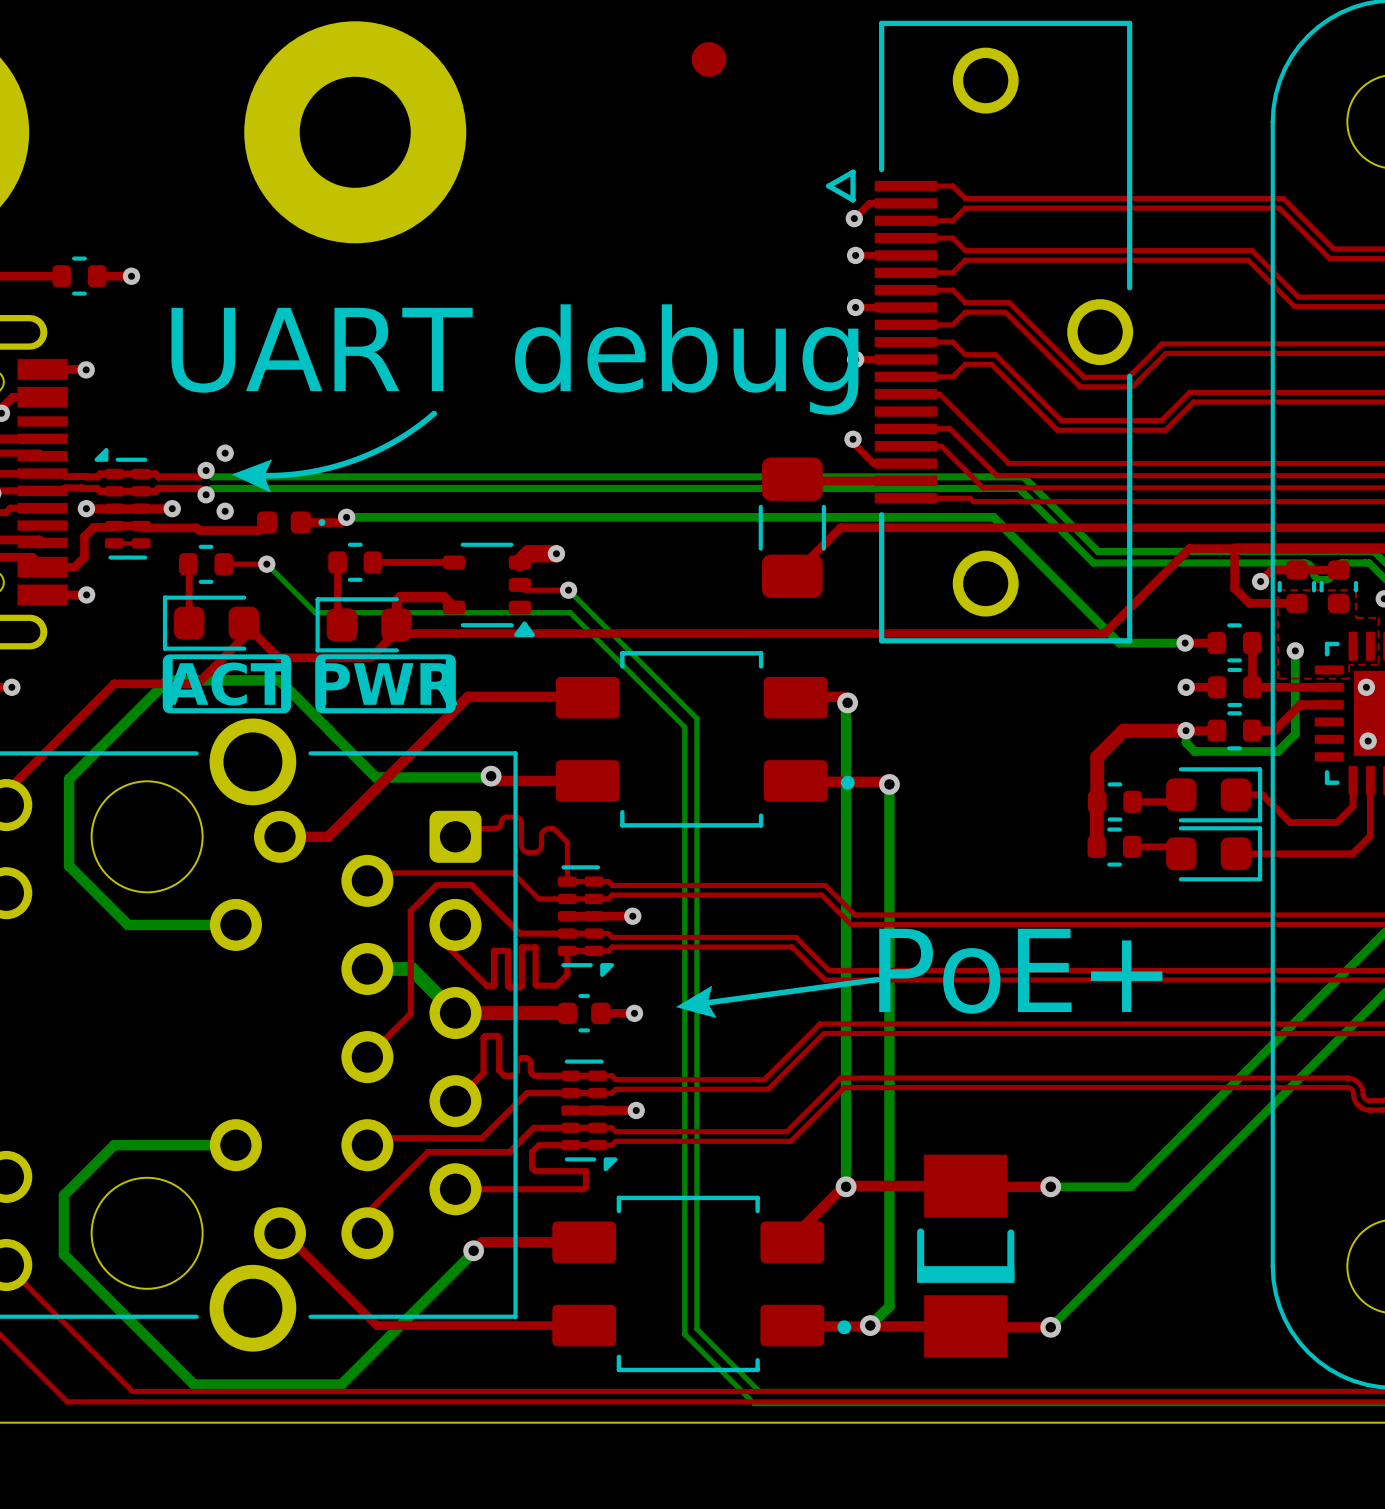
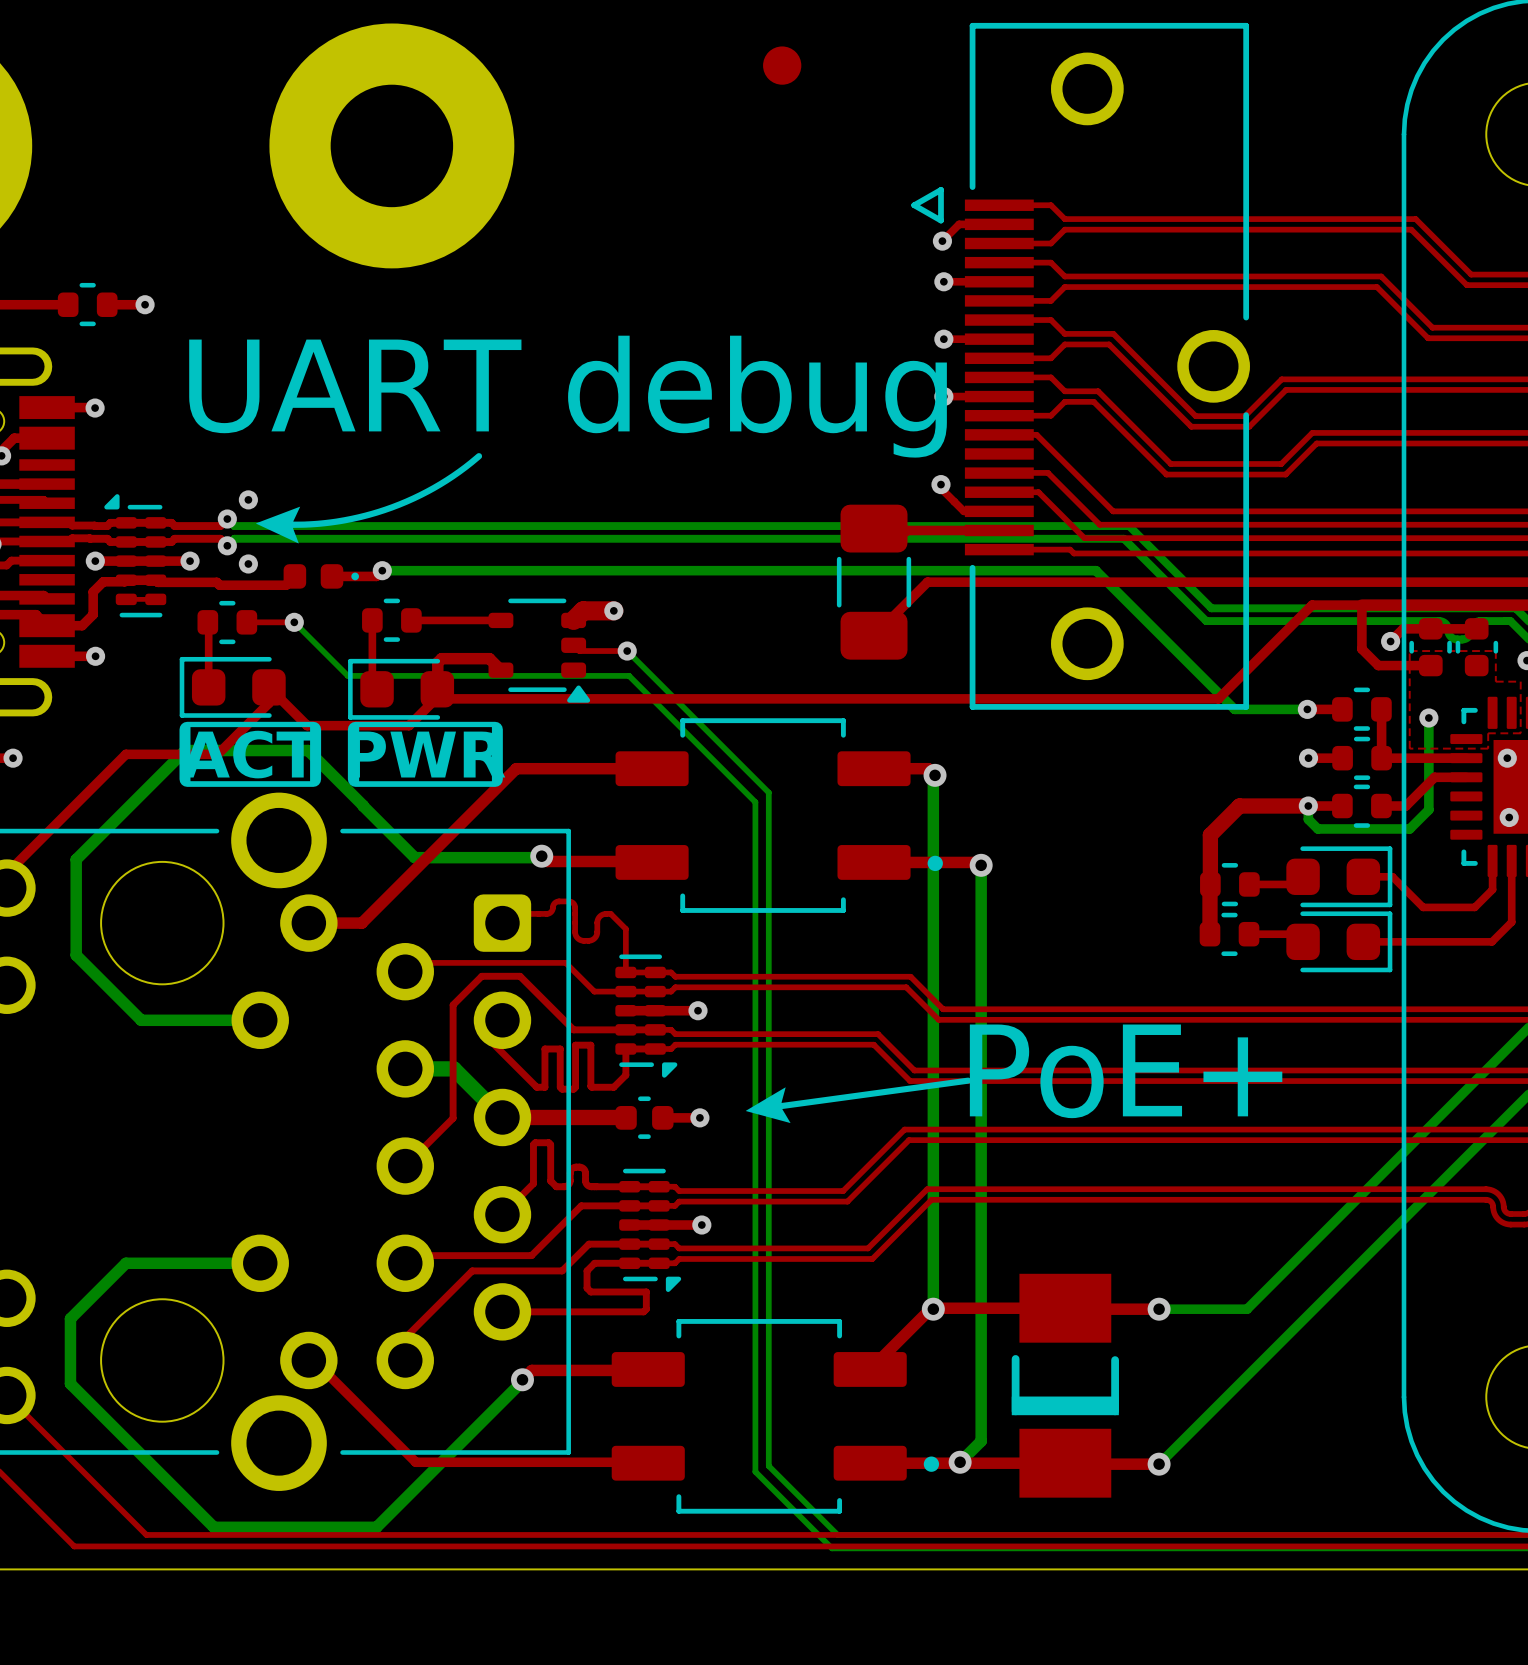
part footprint: [555, 651, 855, 828] -> [615, 718, 943, 913]
part footprint: [552, 1195, 852, 1373] -> [611, 1319, 940, 1514]

